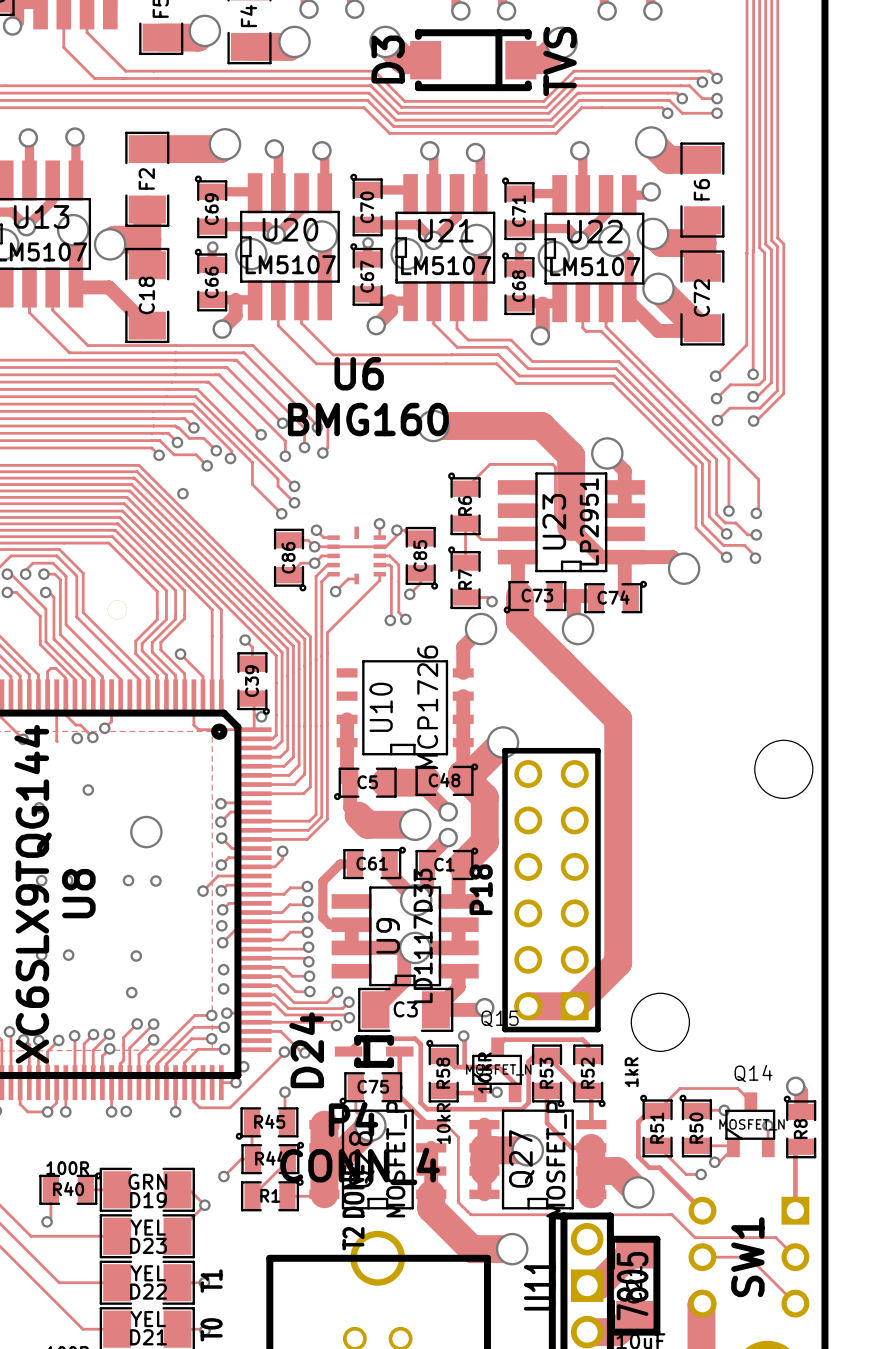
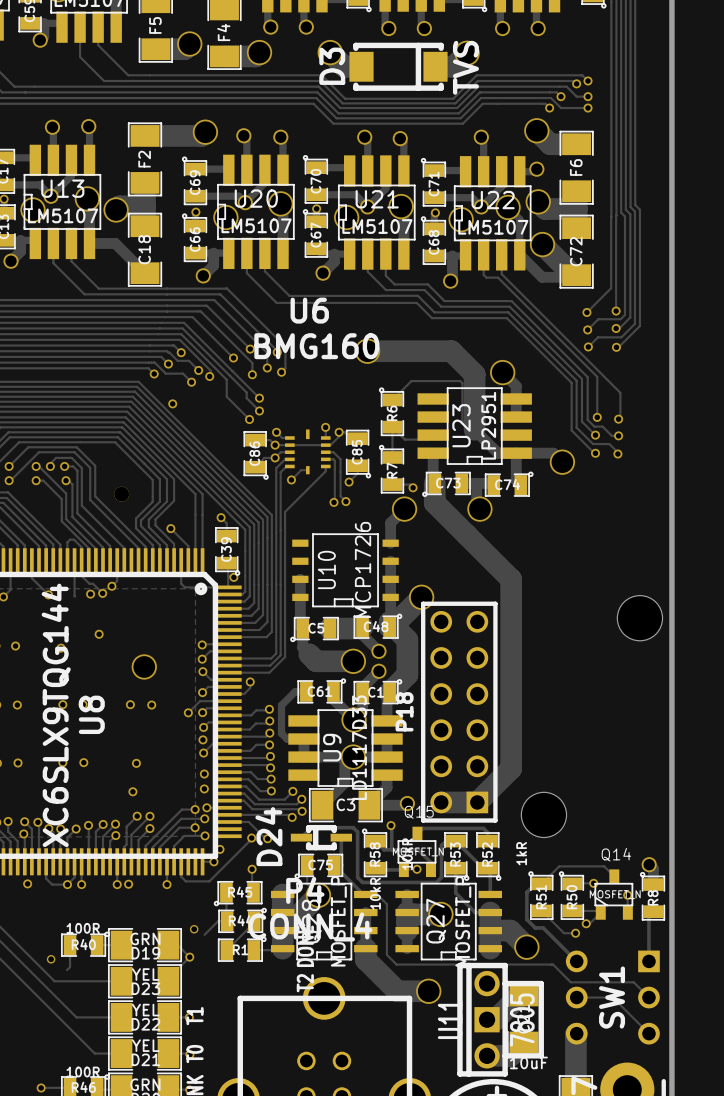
via: none -> (194, 929)
via: (223, 1176) -> none
via: none -> (51, 959)
via: (47, 1221) -> none

